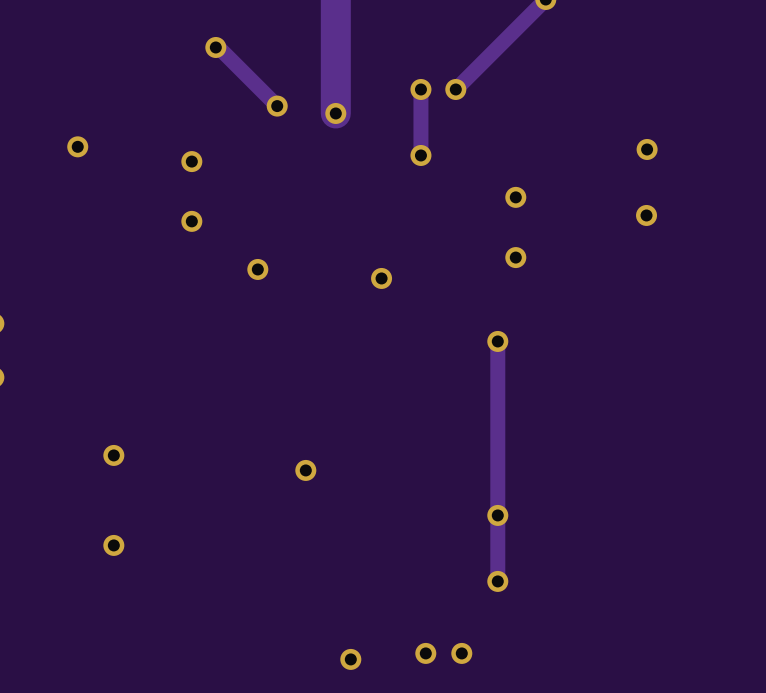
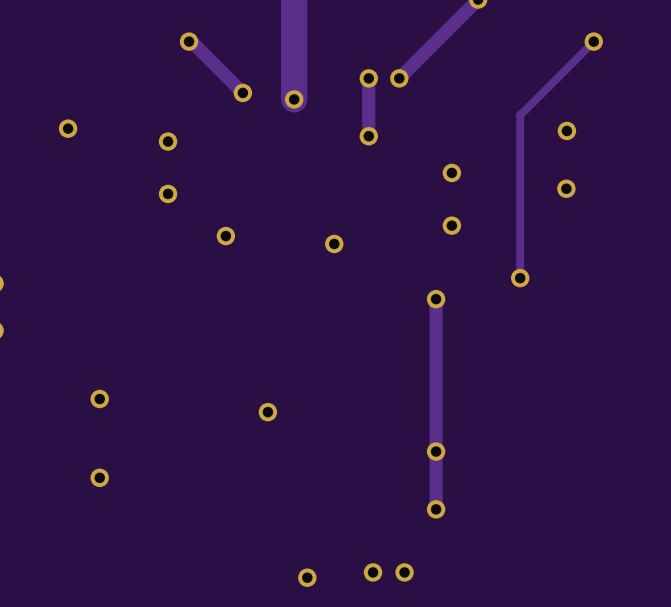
track: none -> (593, 41) (520, 115) (520, 278)
via: none -> (593, 41)
via: none -> (520, 278)

